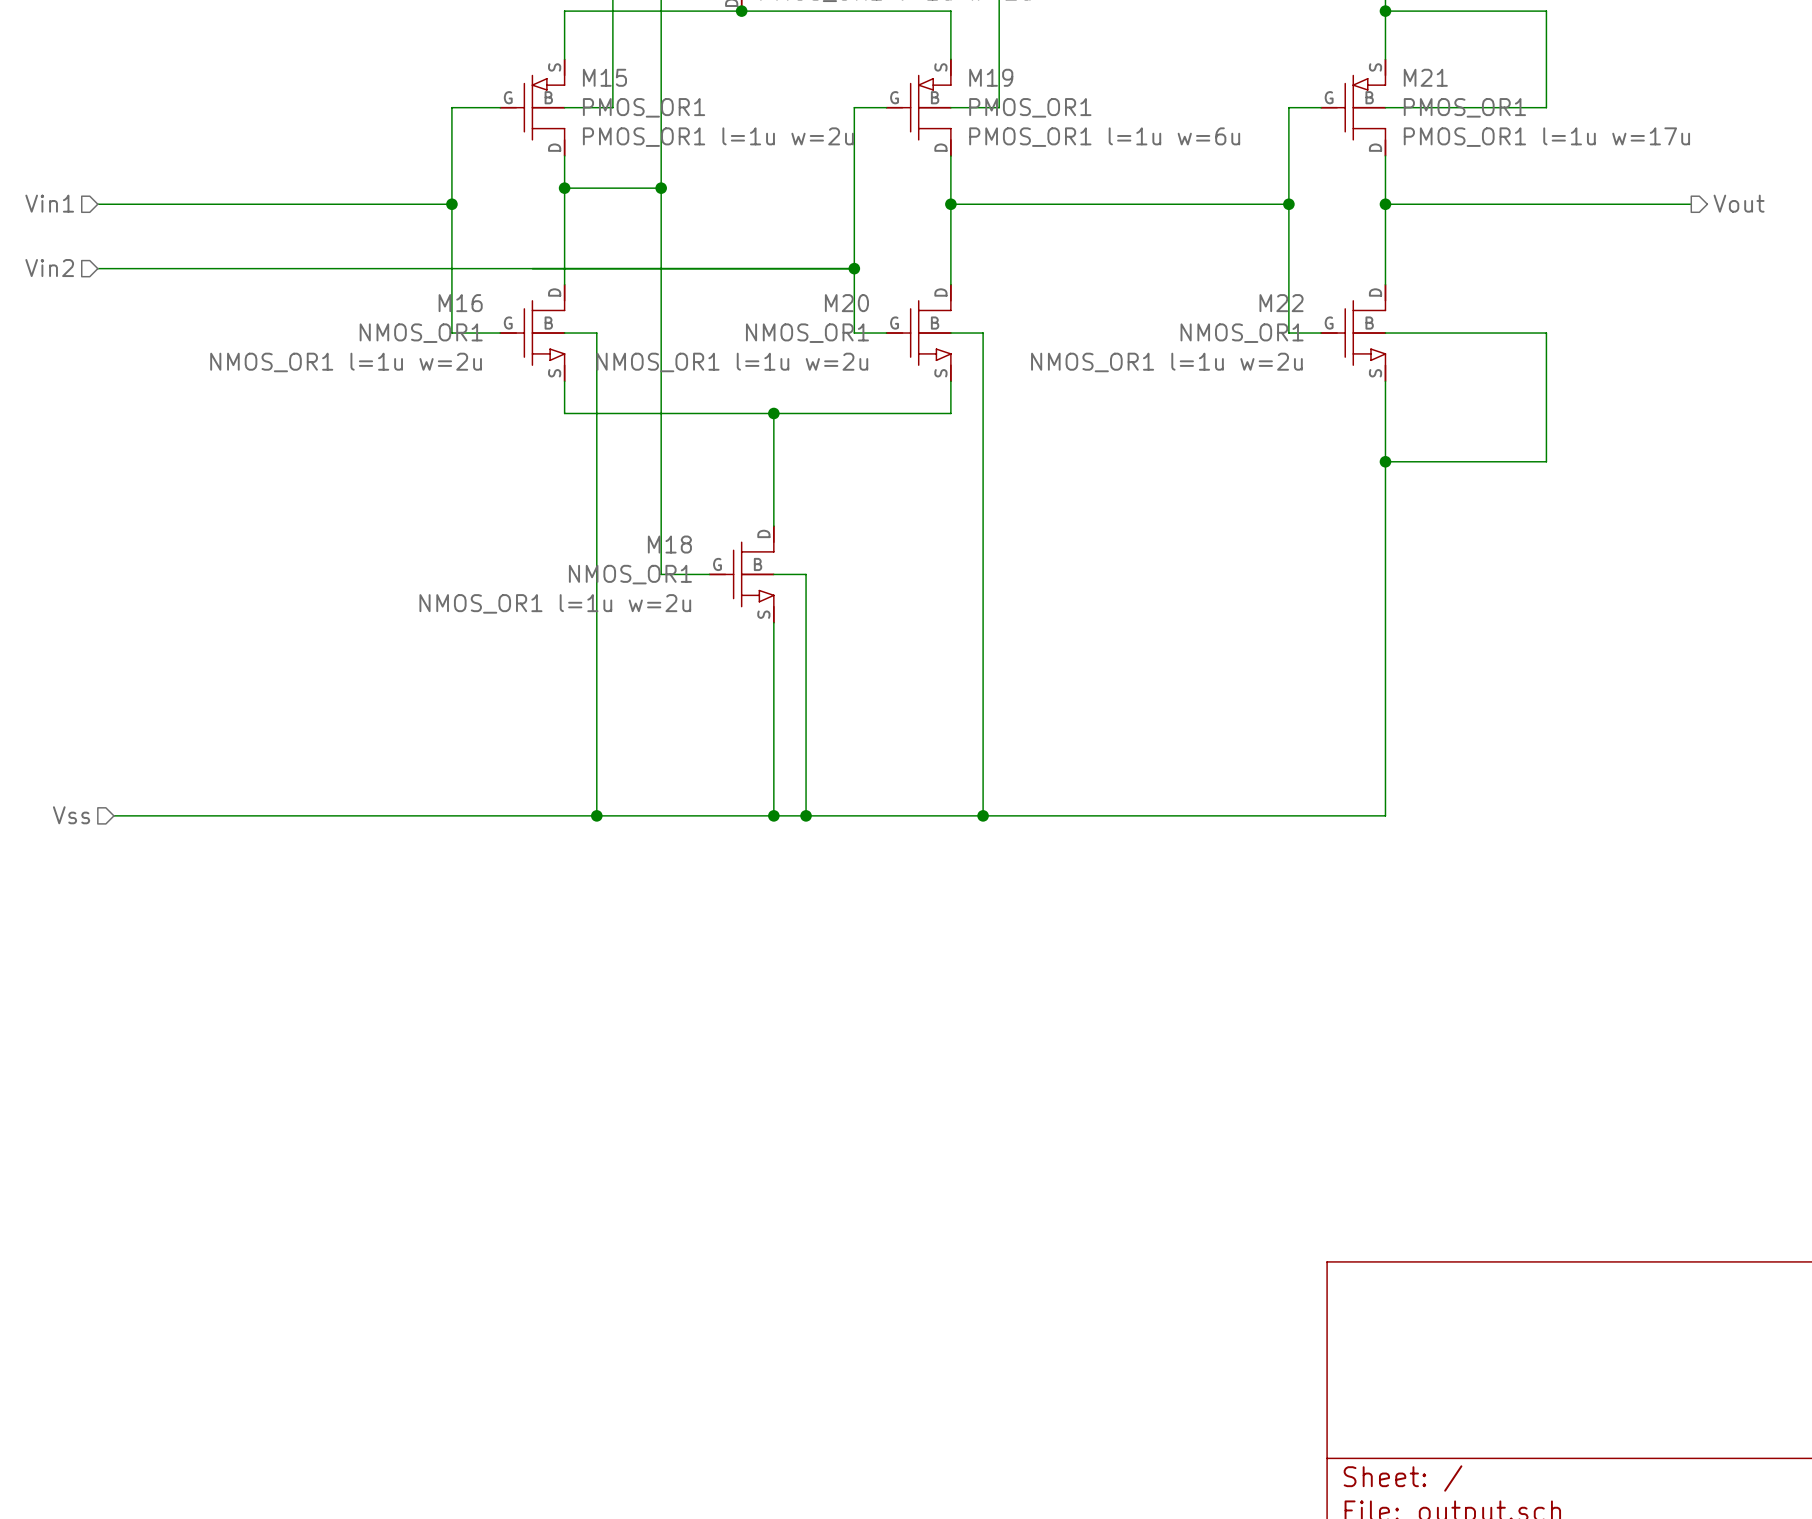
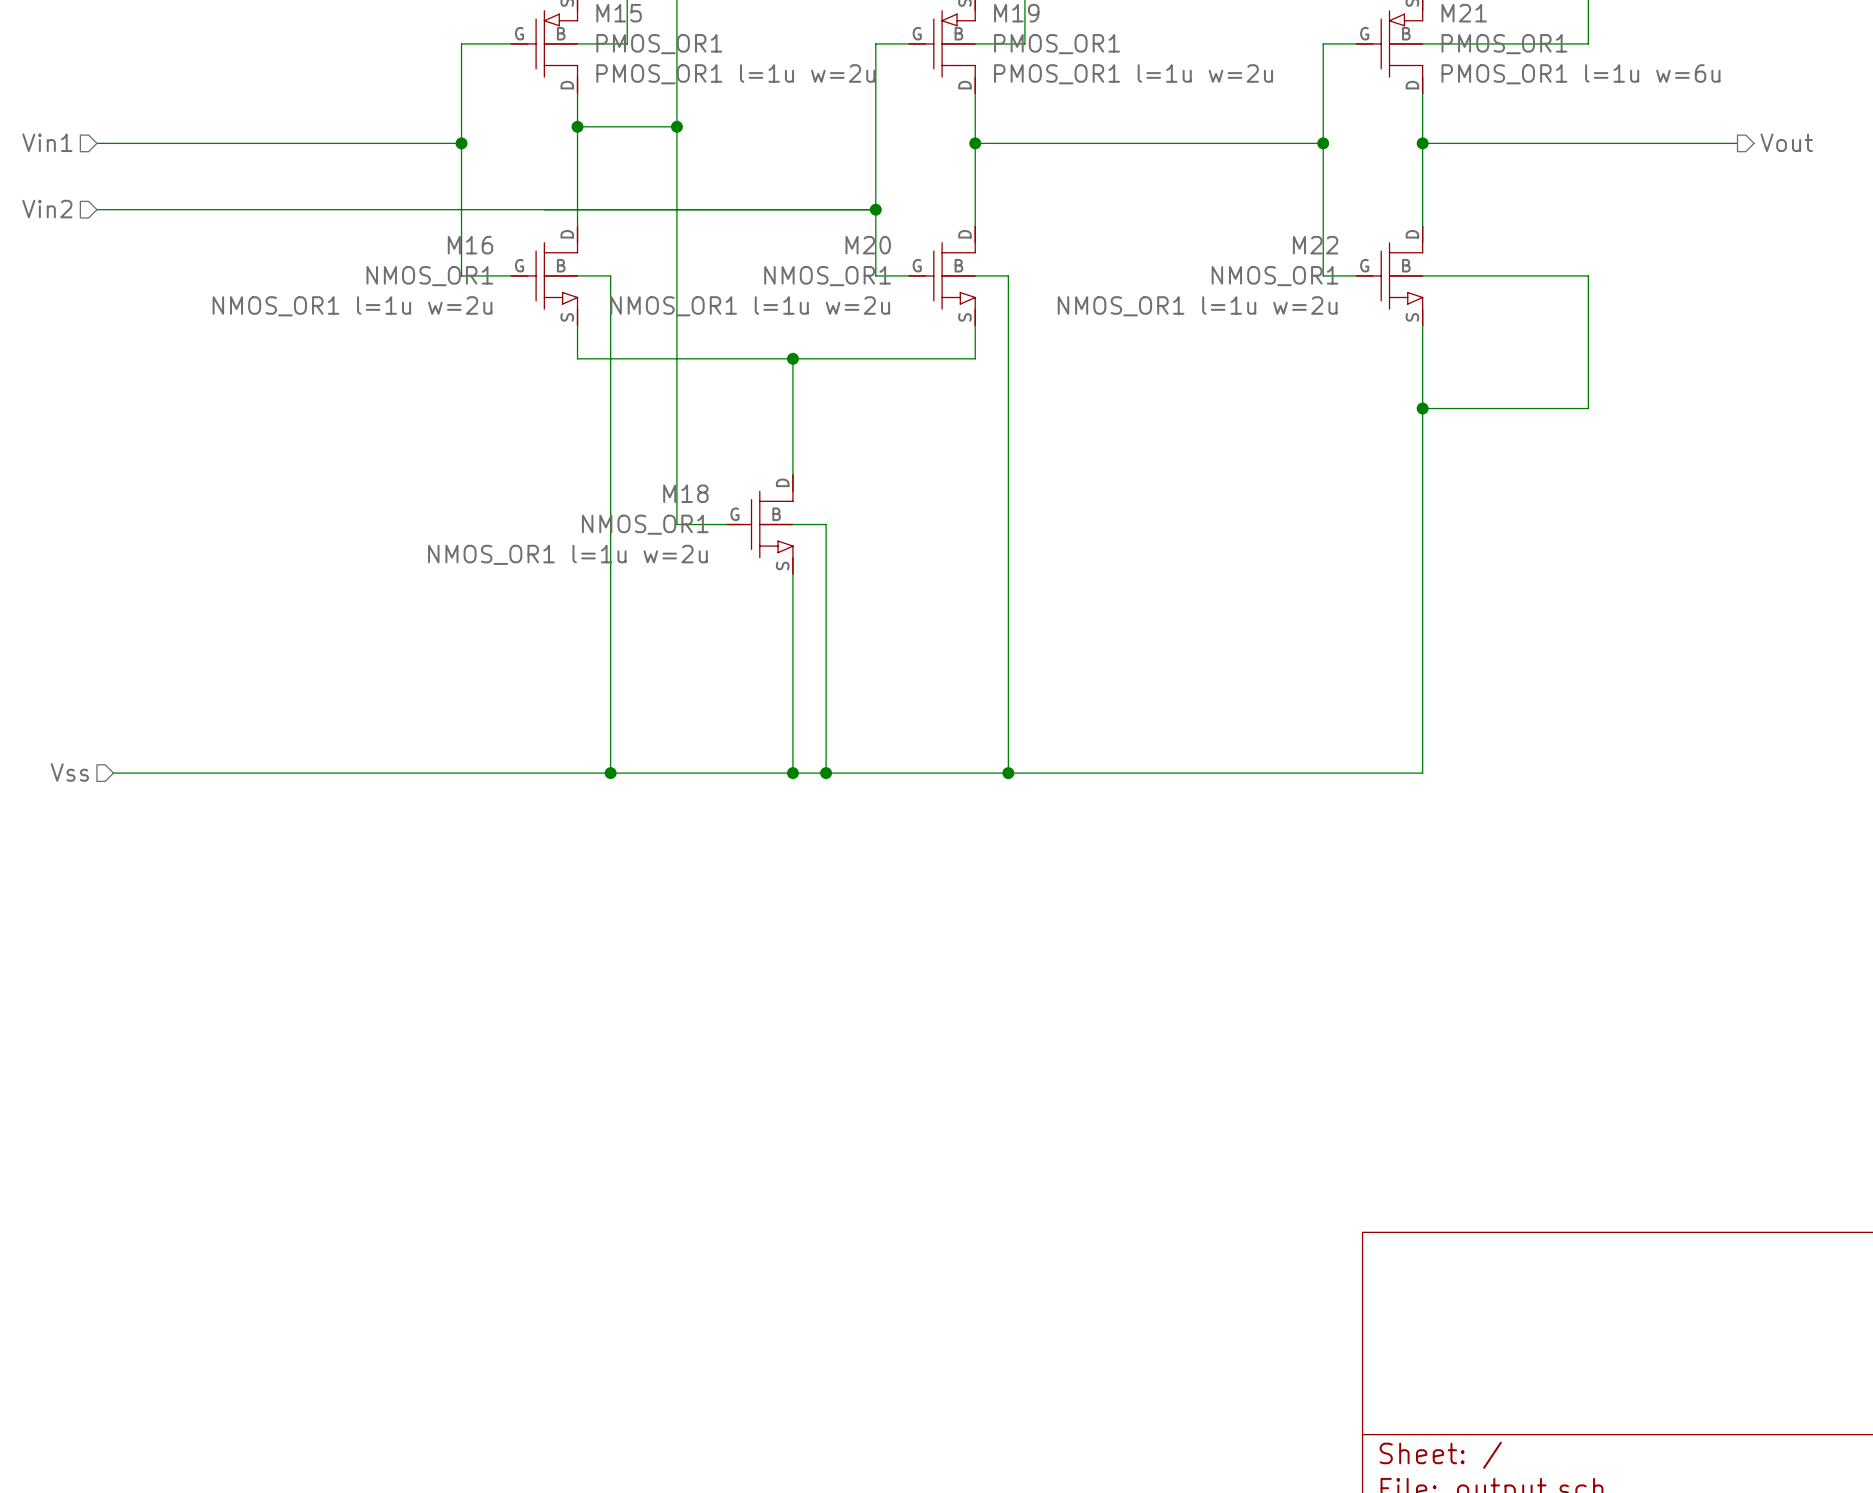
M19 text: PMOS_OR1 l=1u w=6u (1104, 137) -> PMOS_OR1 l=1u w=2u (1133, 74)
M21 text: PMOS_OR1 l=1u w=17u (1546, 137) -> PMOS_OR1 l=1u w=6u (1580, 74)

